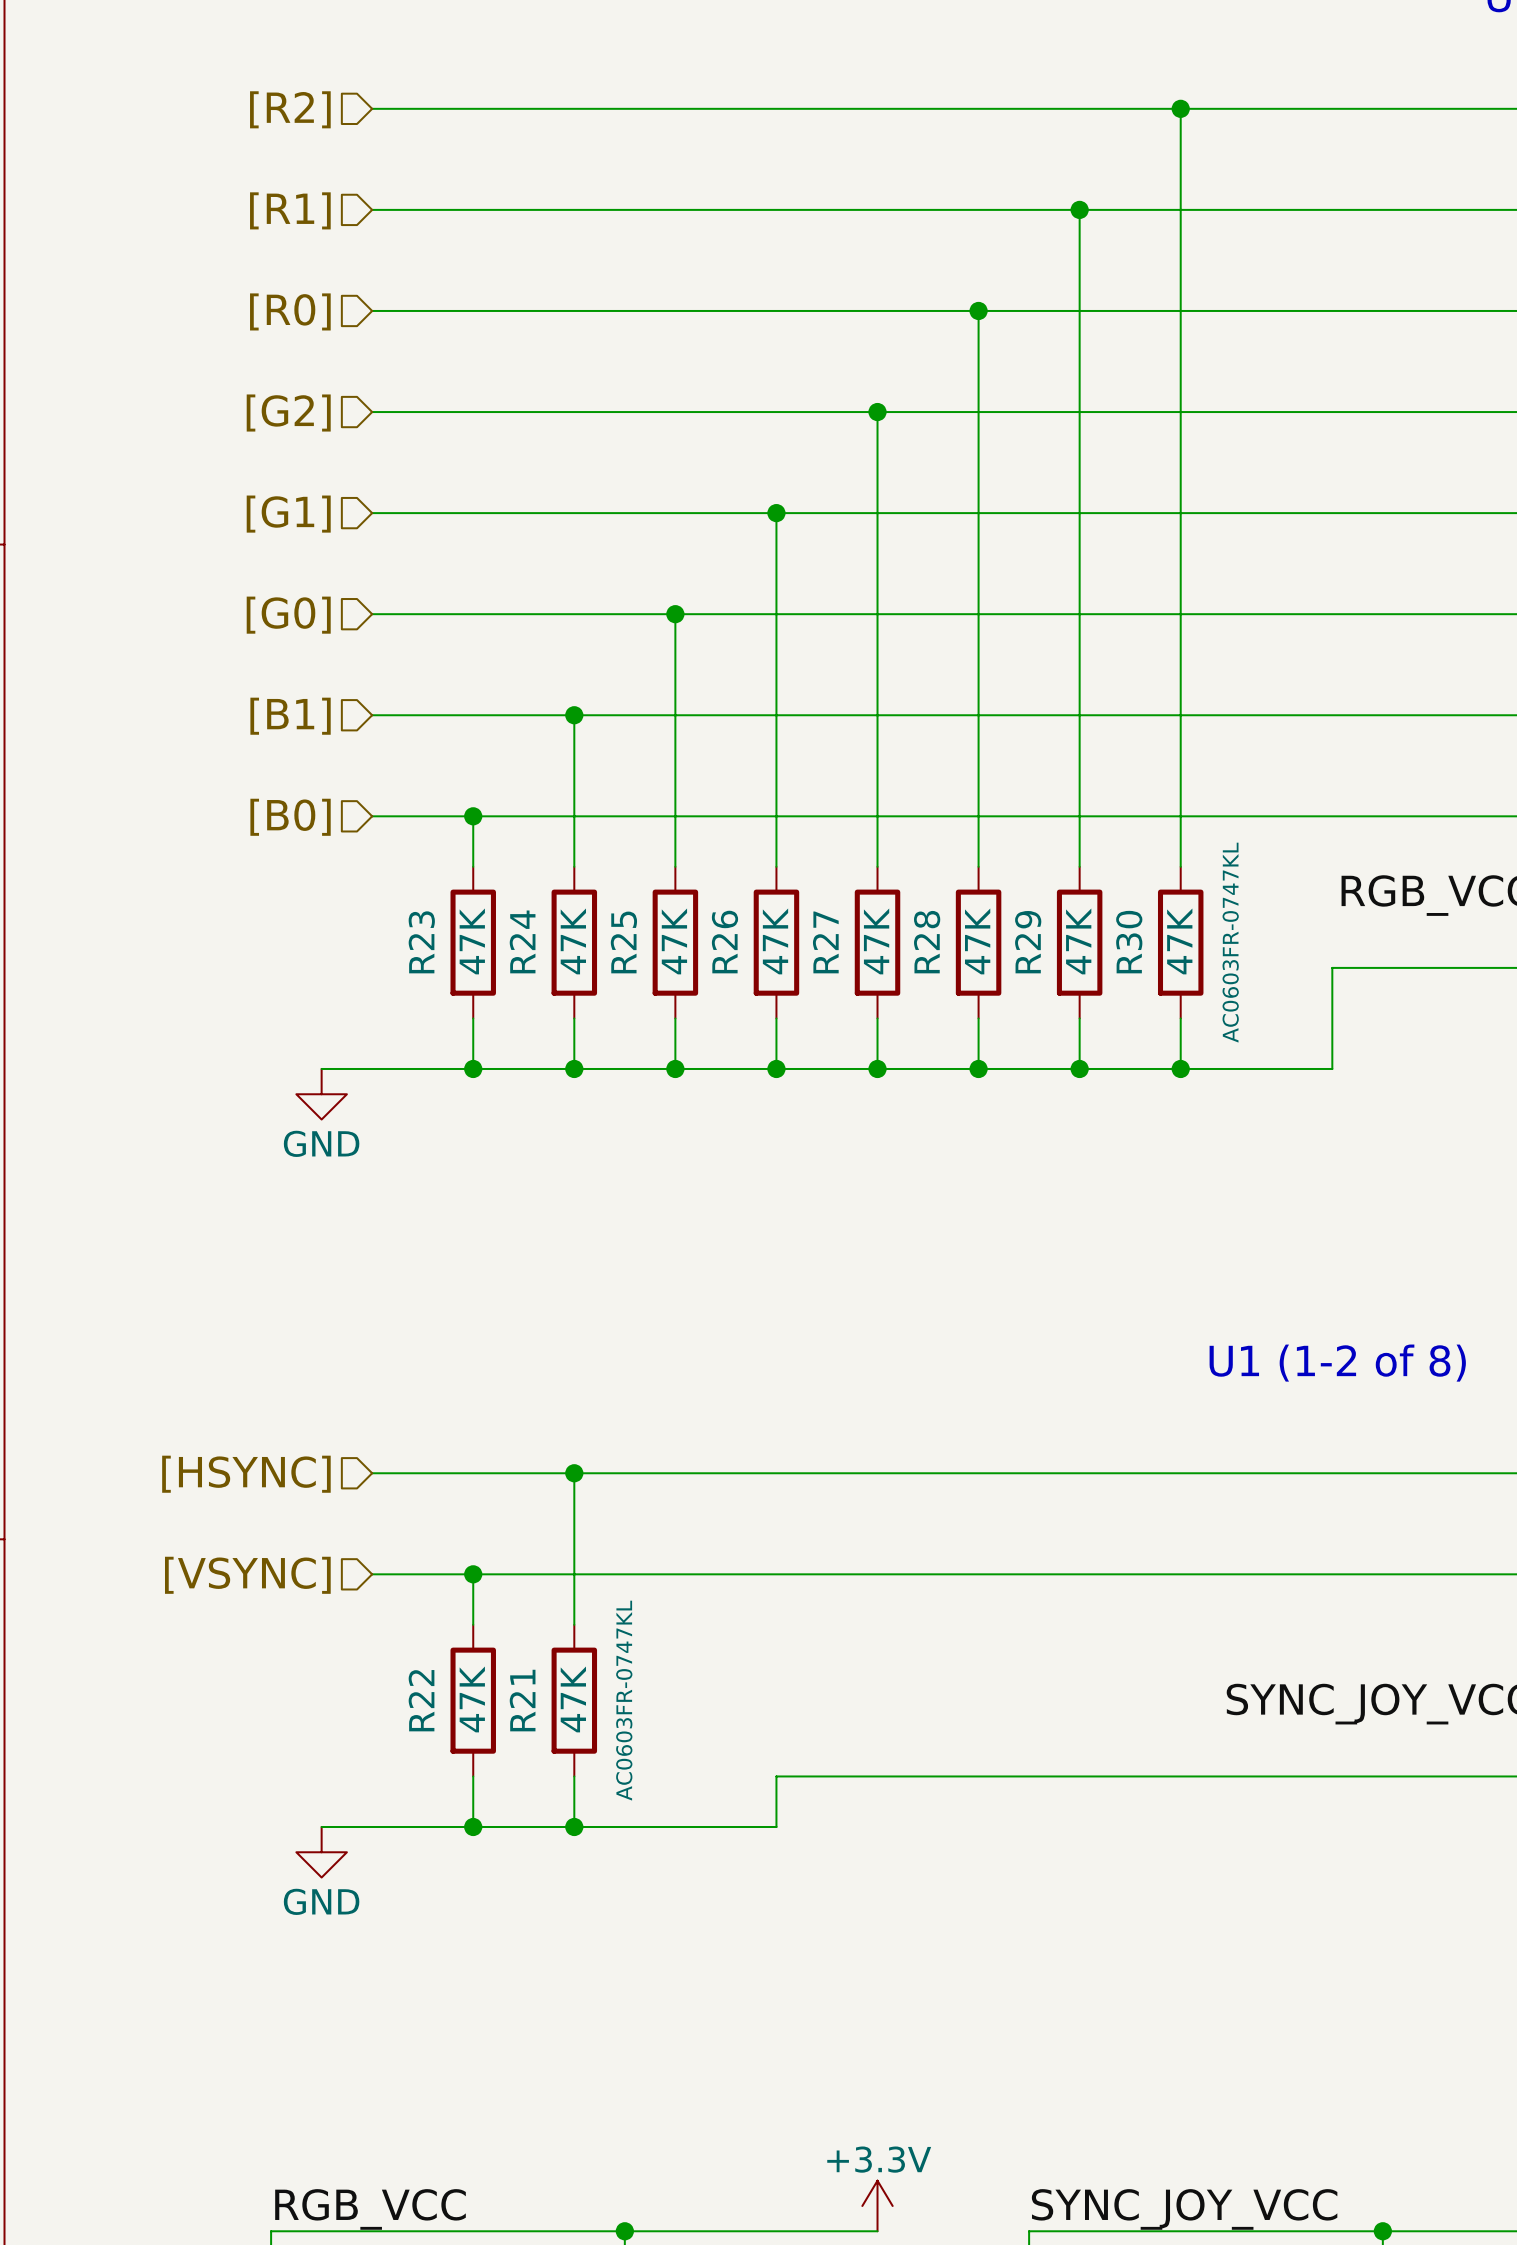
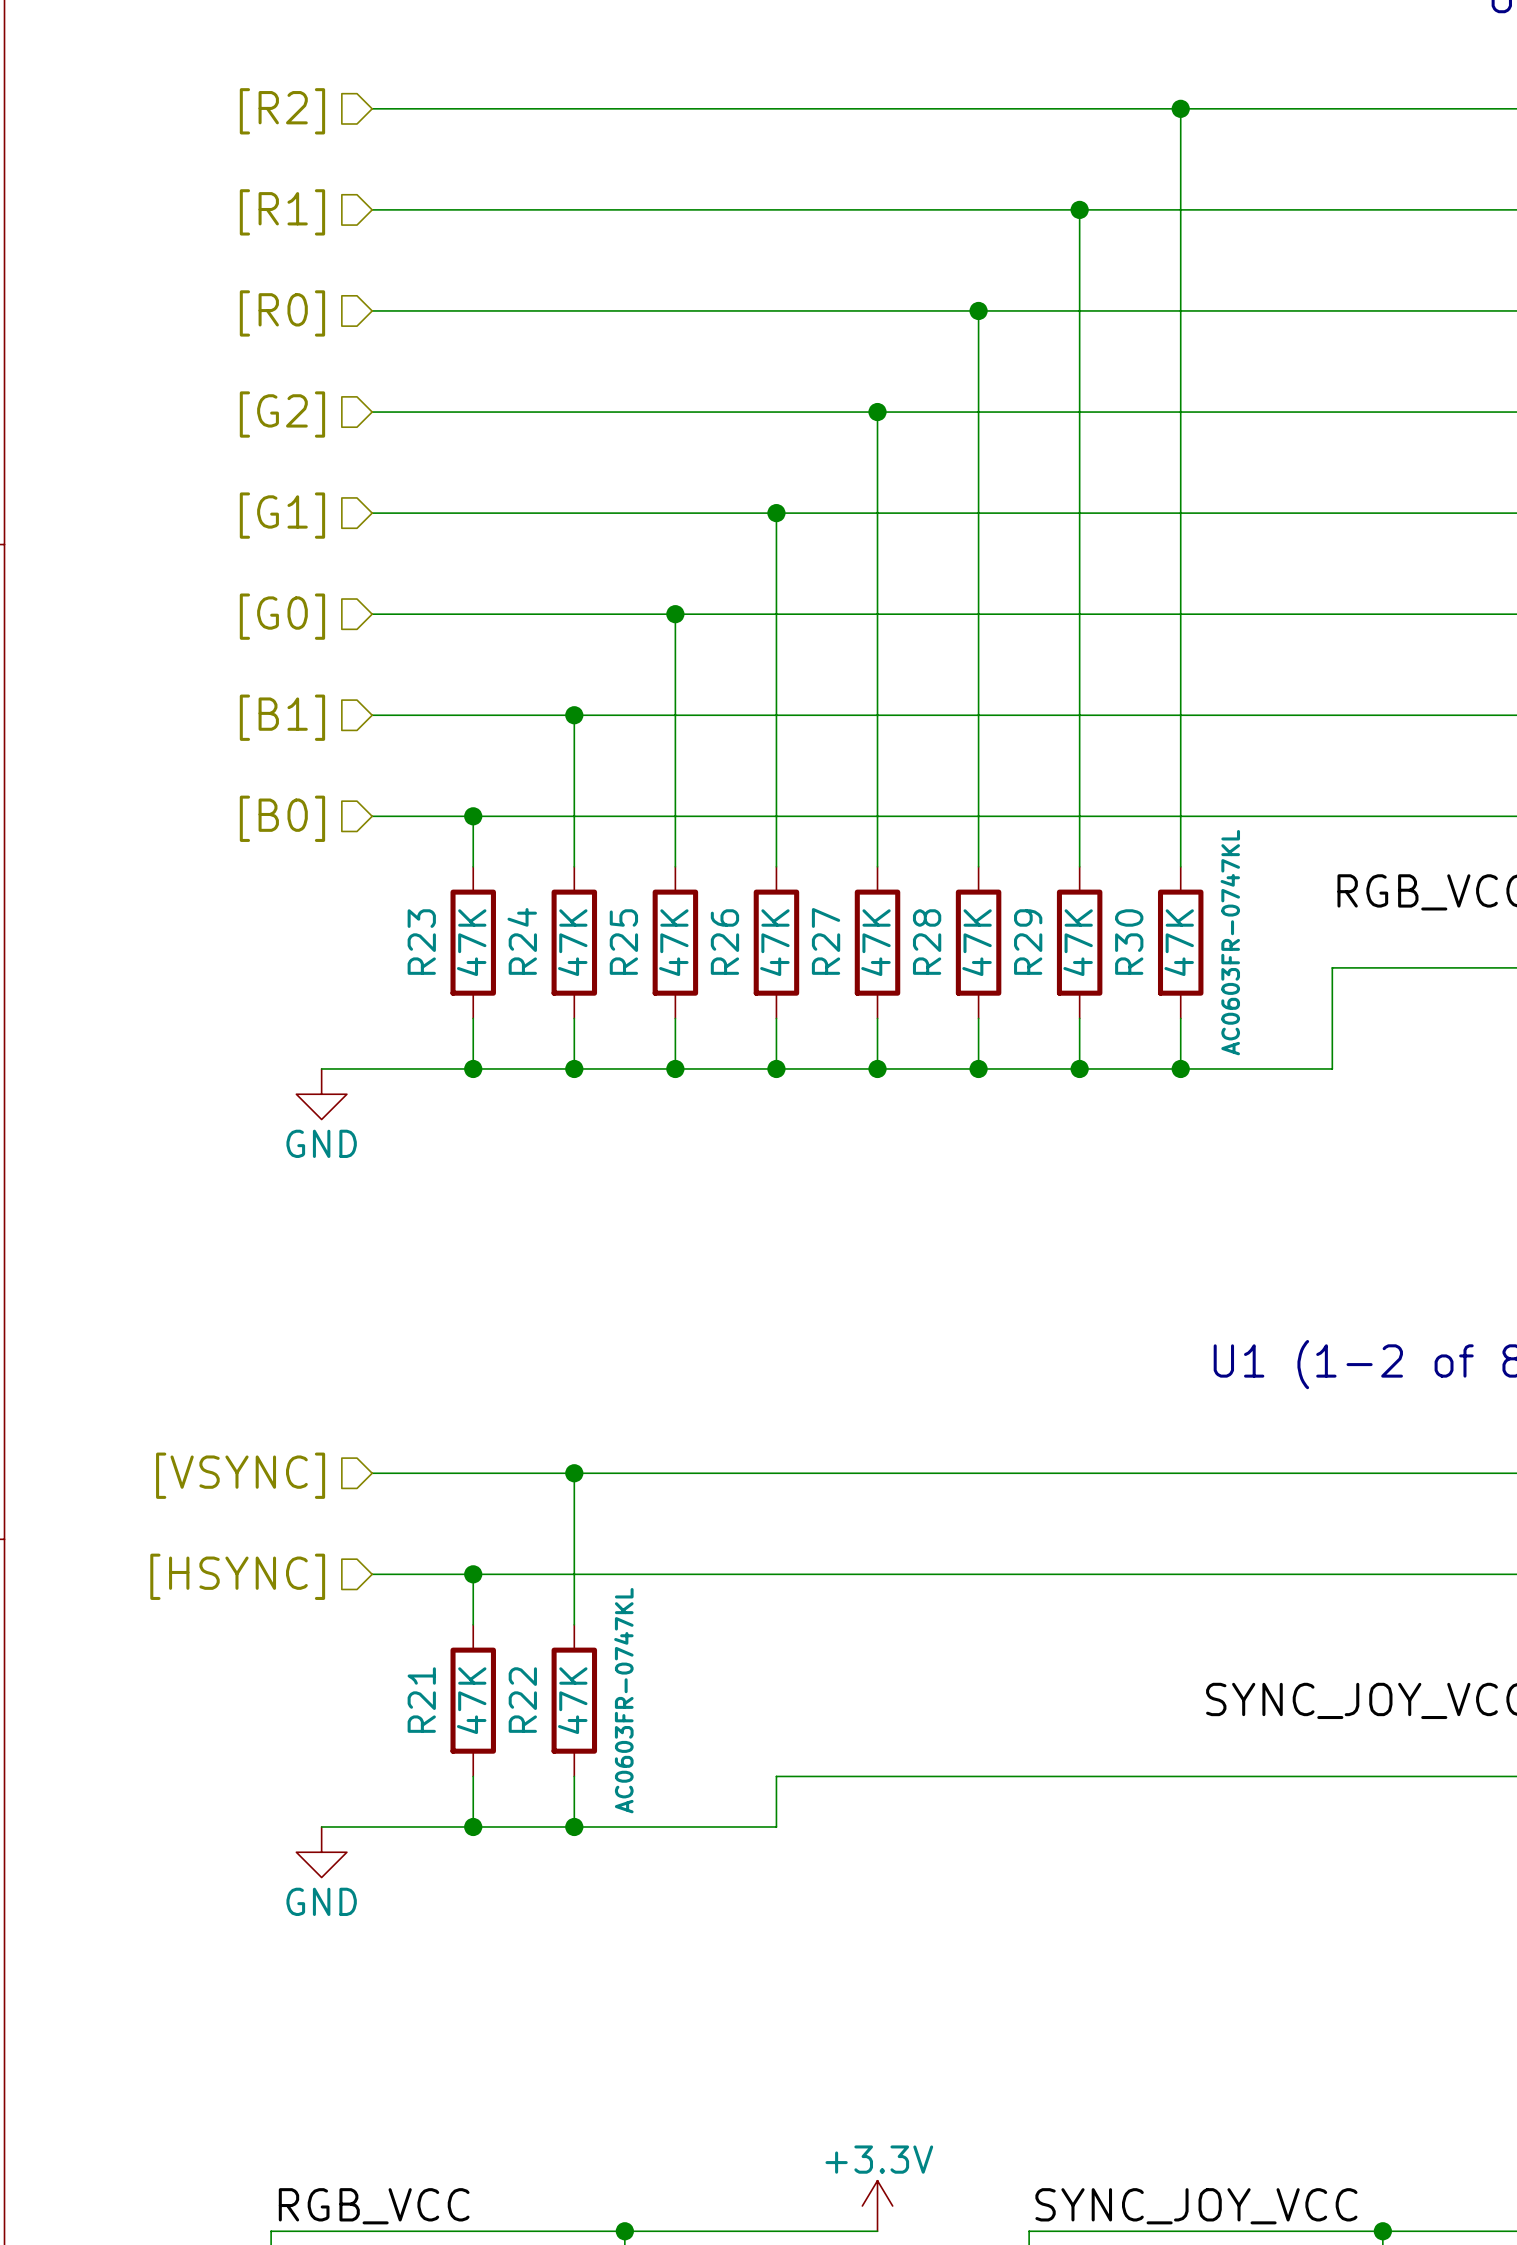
hierarchical label: [HSYNC] (246, 1474) -> [VSYNC] (240, 1475)
hierarchical label: [VSYNC] (247, 1575) -> [HSYNC] (237, 1576)
R22 name: R22 (421, 1700) -> R21 (421, 1700)
R21 name: R21 (522, 1700) -> R22 (522, 1700)

